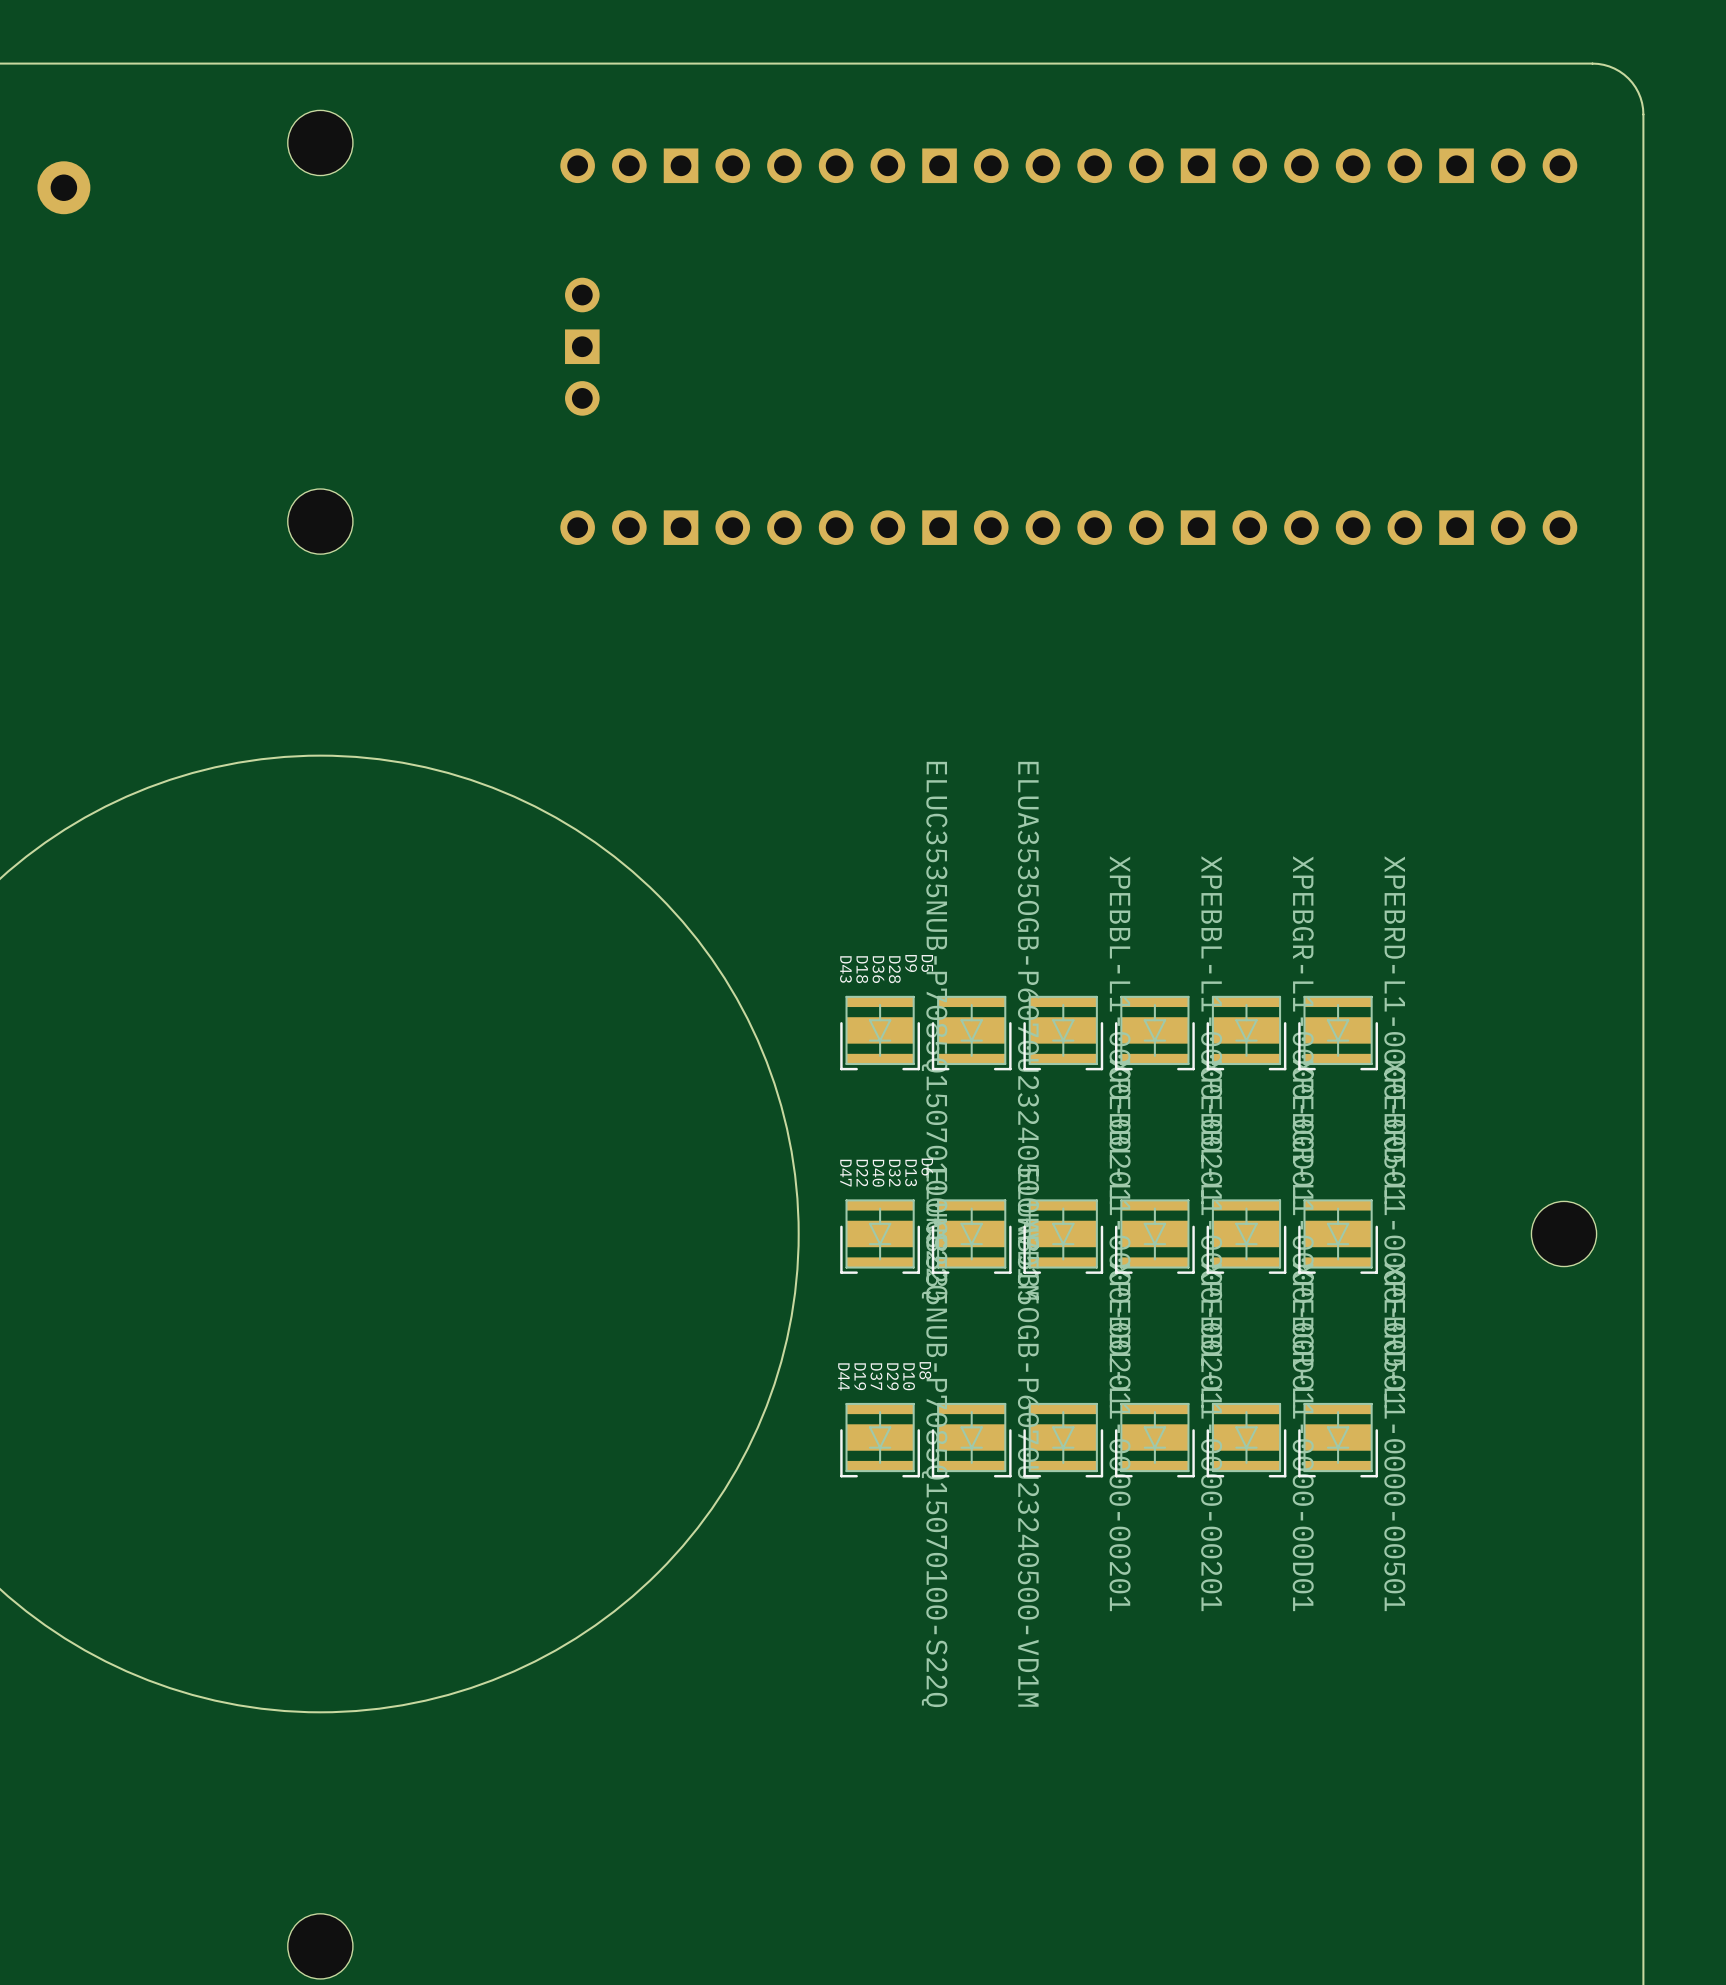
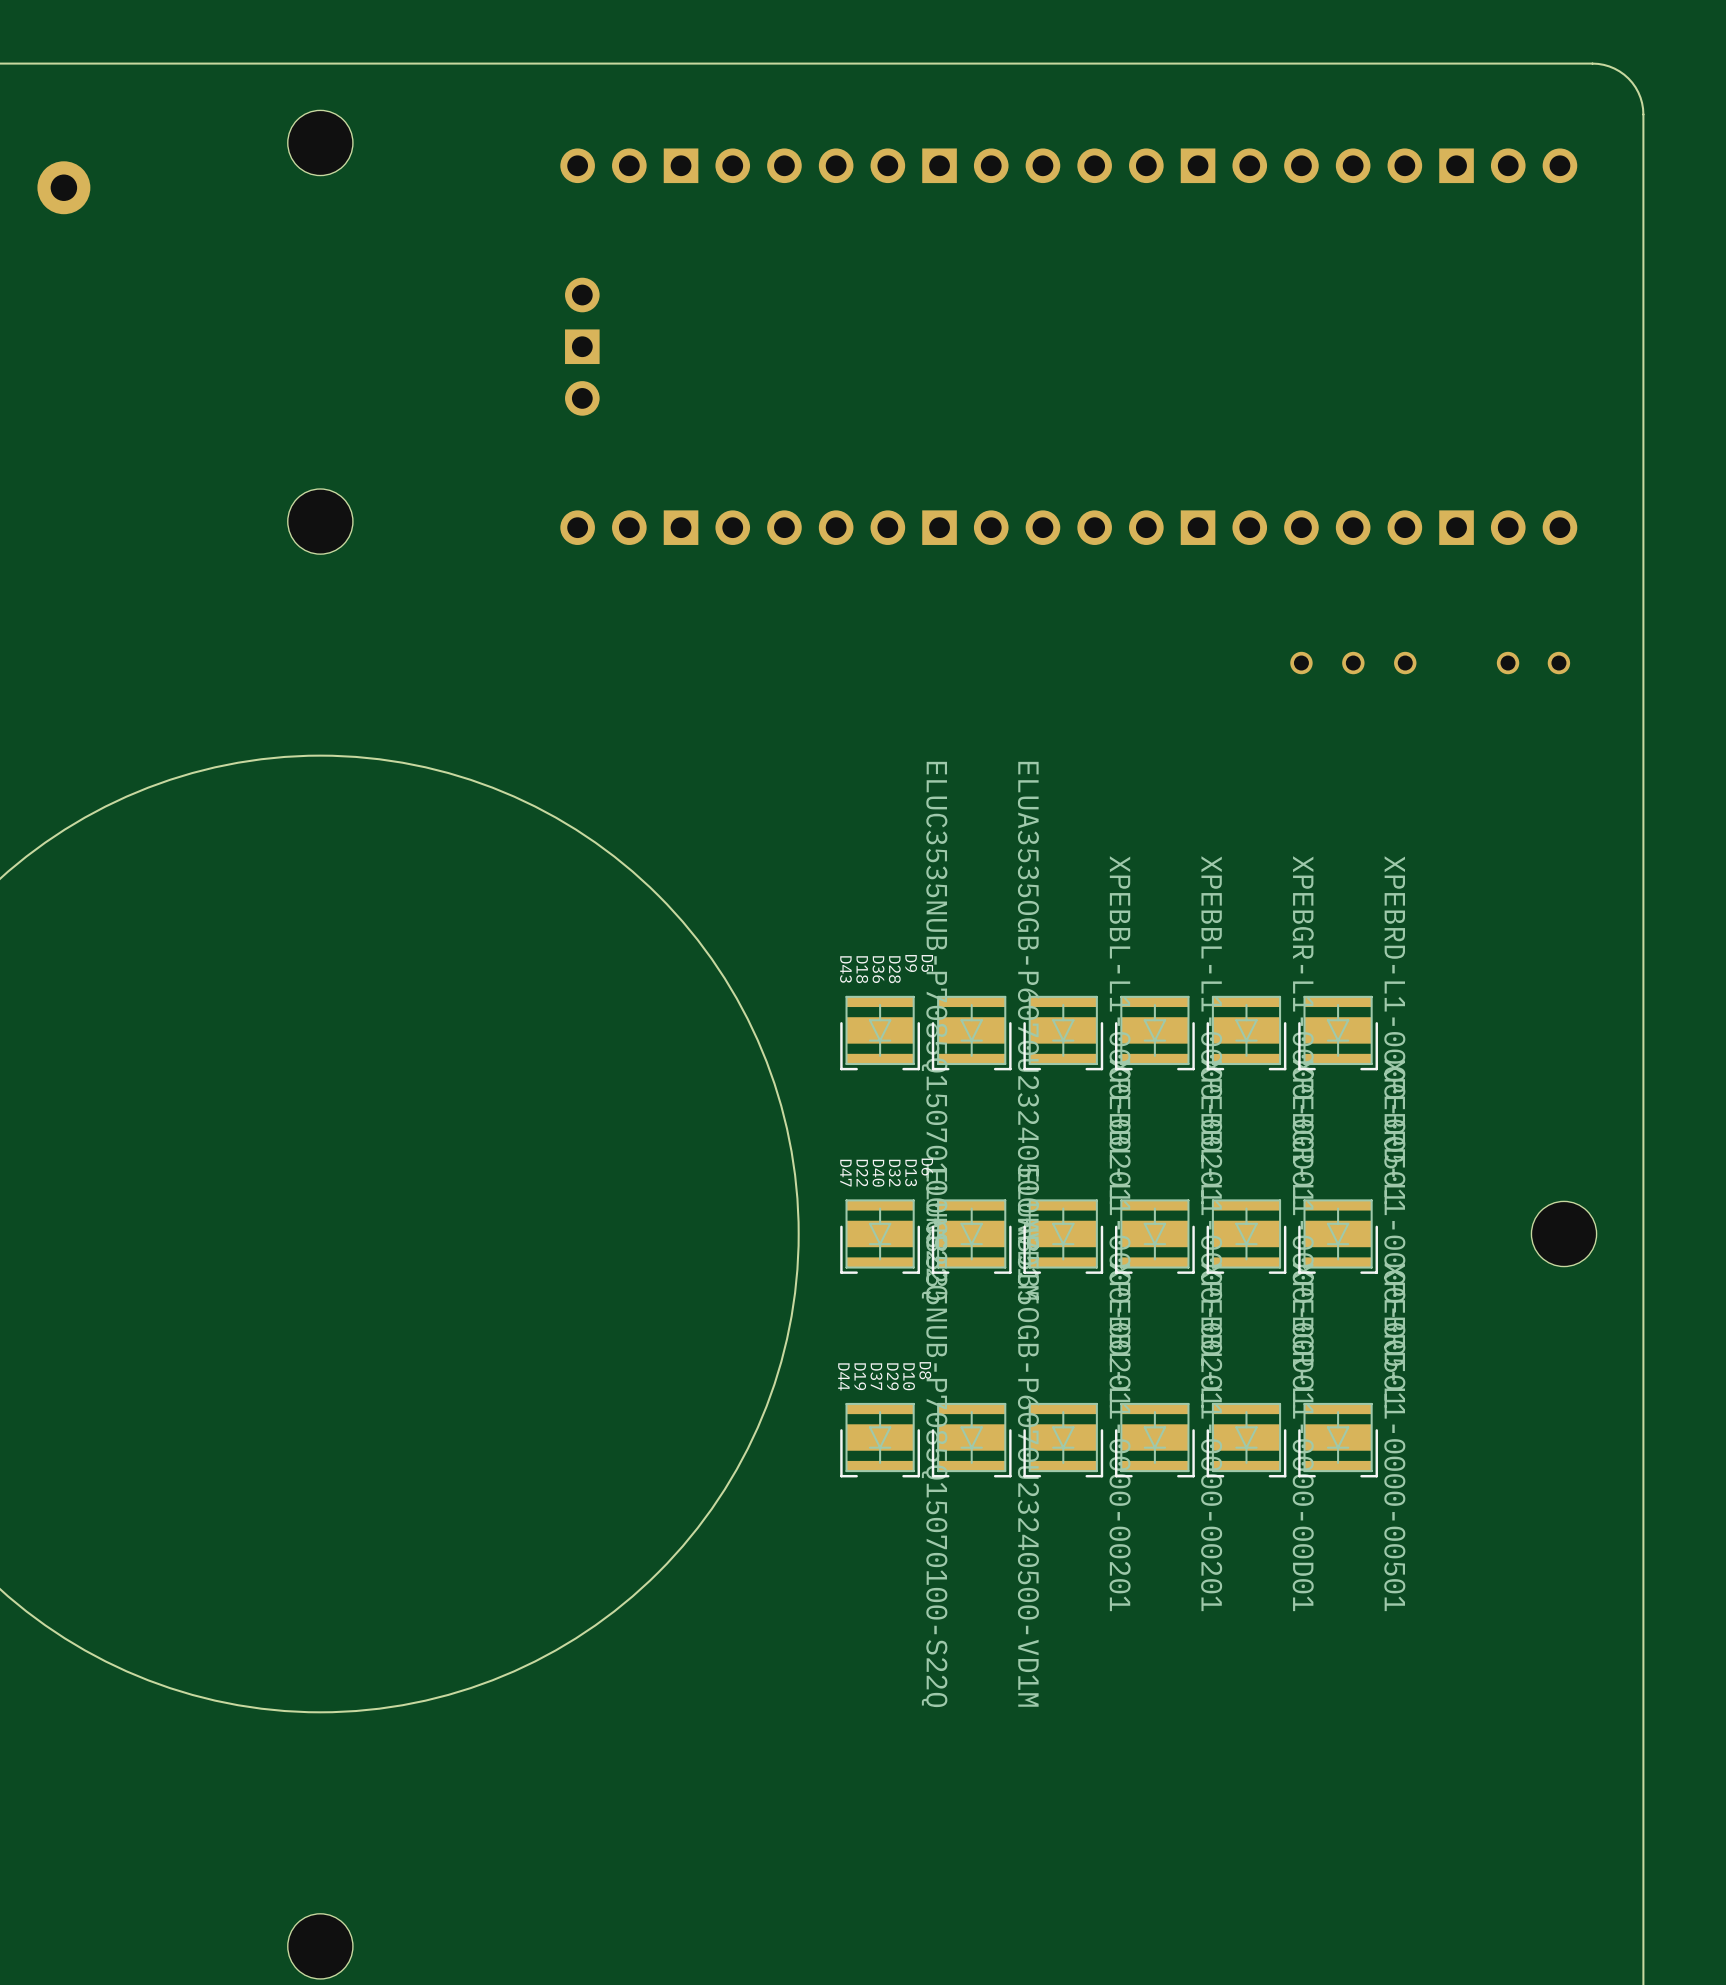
part: none -> (1301, 663)
part: none -> (1353, 663)
part: none -> (1405, 663)
part: none -> (1508, 663)
part: none -> (1558, 663)

